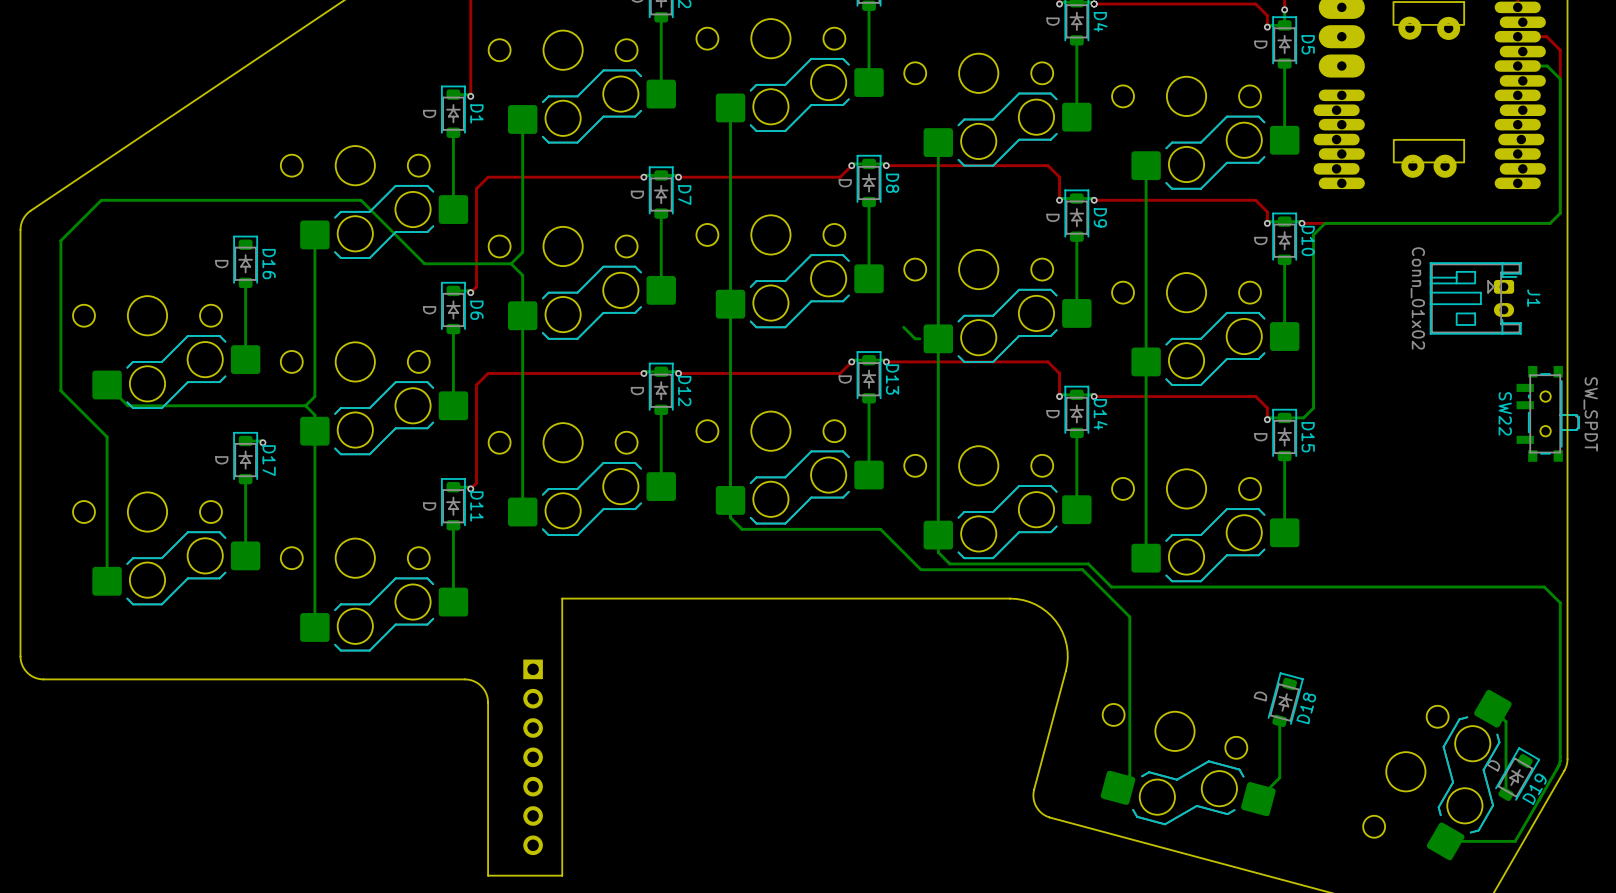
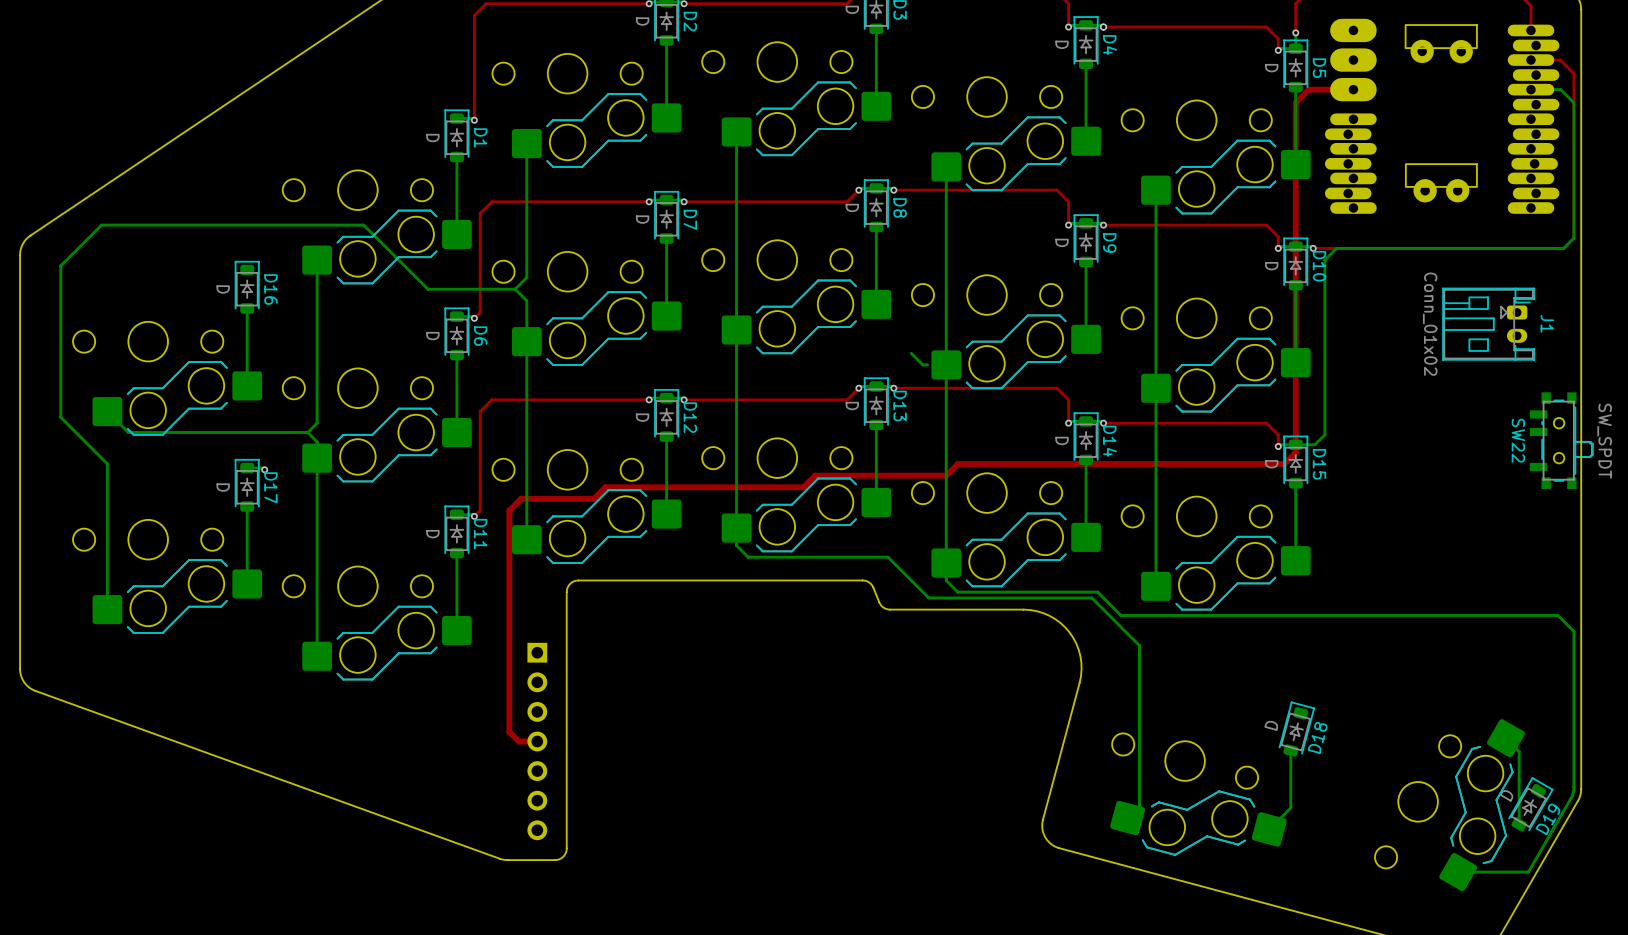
top track: none -> (1353, 89) (1308, 89) (1295, 102) (1295, 452) (1284, 463) (957, 463) (946, 475) (815, 475) (803, 487) (605, 487) (593, 498) (521, 498) (509, 510) (509, 731) (518, 741) (537, 741)
board edge: (562, 598) (1016, 598) (1029, 601) (1041, 607) (1055, 621) (1062, 632) (1066, 645) (1067, 658) (1065, 671) -> (566, 627) (567, 589) (571, 583) (577, 580) (864, 580) (871, 584) (880, 604) (887, 609) (1030, 609) (1042, 613) (1054, 618) (1065, 627) (1073, 637) (1080, 656) (1080, 676) (1074, 700)
board edge: (20, 640) (22, 666) (29, 674) (41, 679) (472, 680) (483, 688) (487, 699) (488, 875) (562, 875) (562, 817) -> (20, 668) (24, 682) (35, 690) (499, 858) (556, 860) (564, 855) (566, 848)
part position: (533, 757) -> (537, 741)

